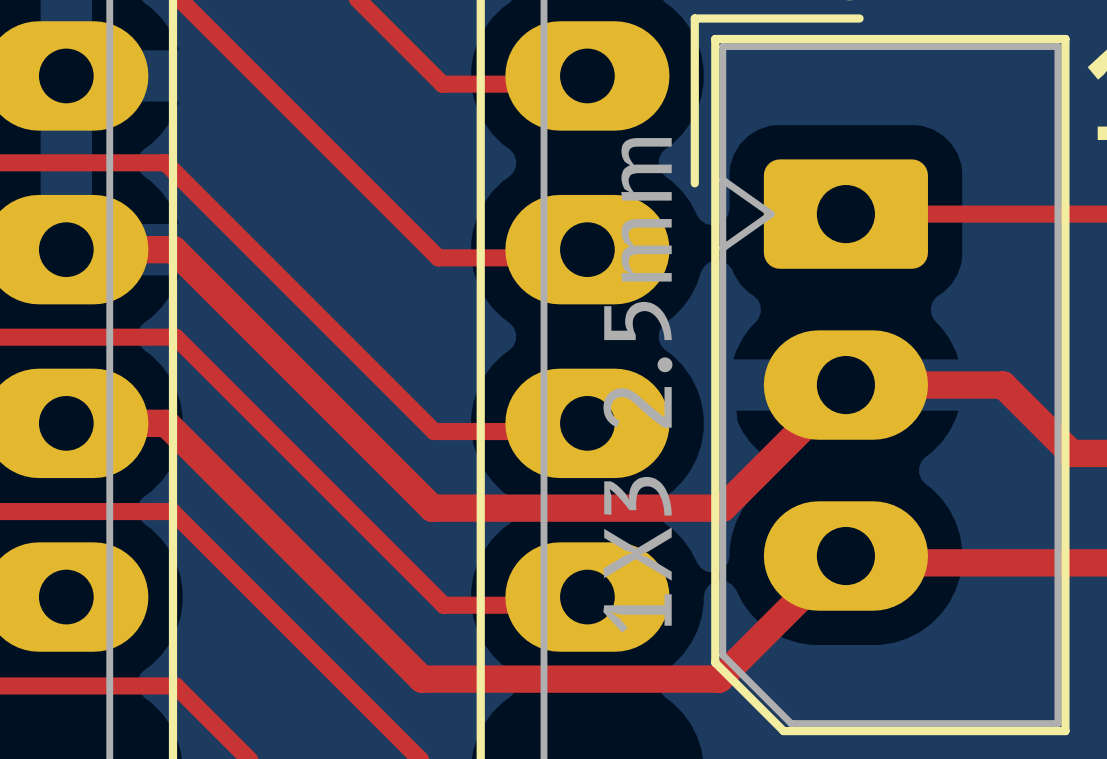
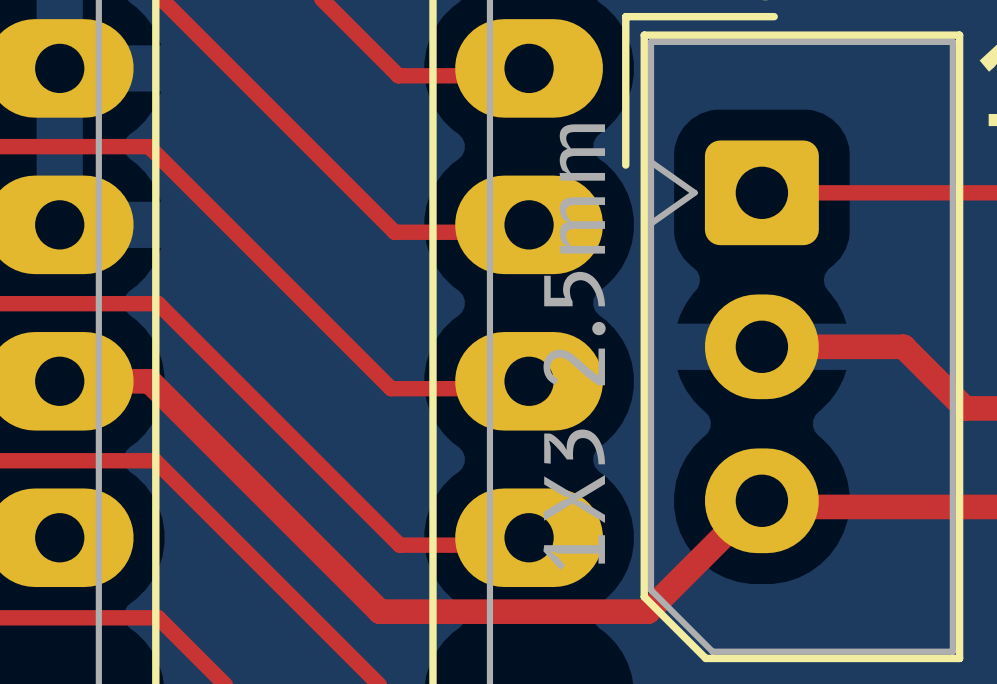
part footprint: [690, 14, 1070, 736] -> [622, 12, 964, 663]
top track: (66, 249) (173, 249) (432, 508) (722, 508) (845, 385) -> none

